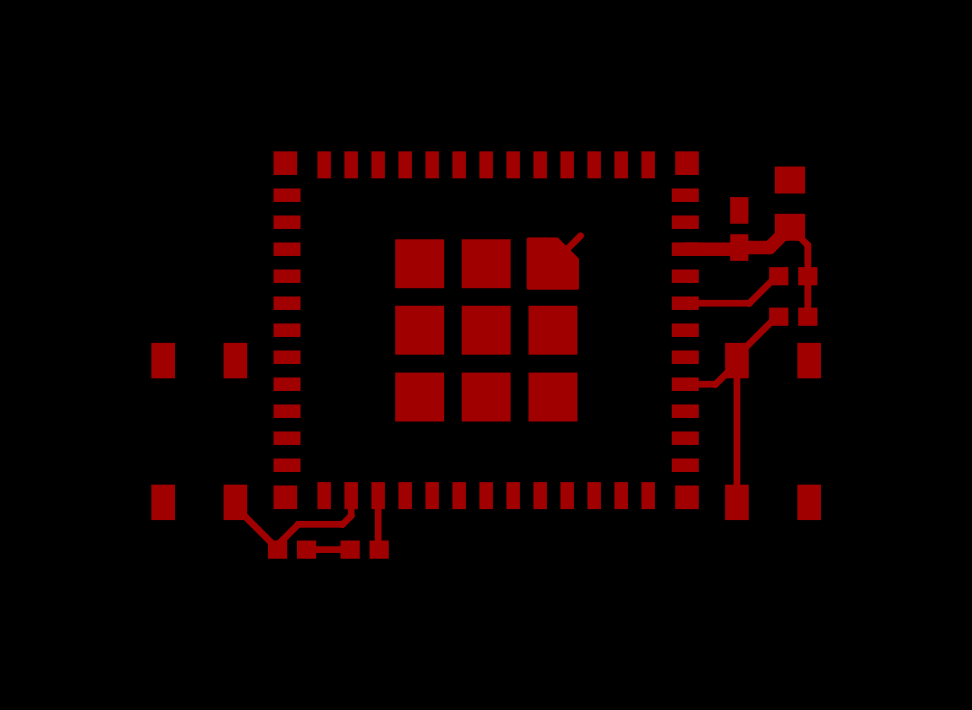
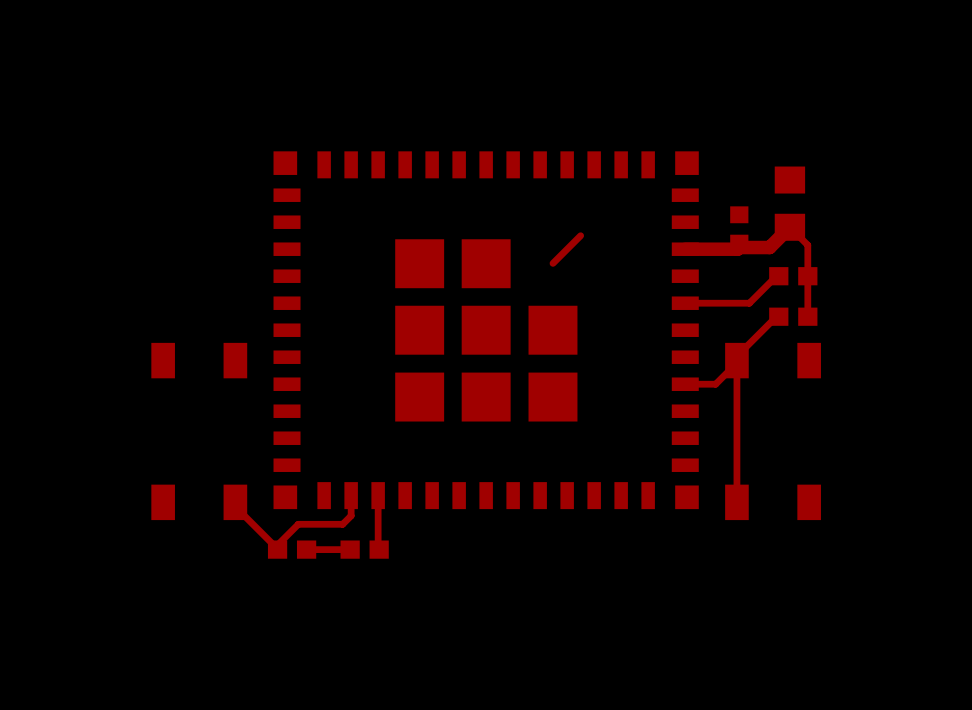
part footprint: [273, 151, 699, 510] -> [273, 151, 699, 510]
part footprint: [730, 197, 749, 261] -> [730, 206, 749, 252]

